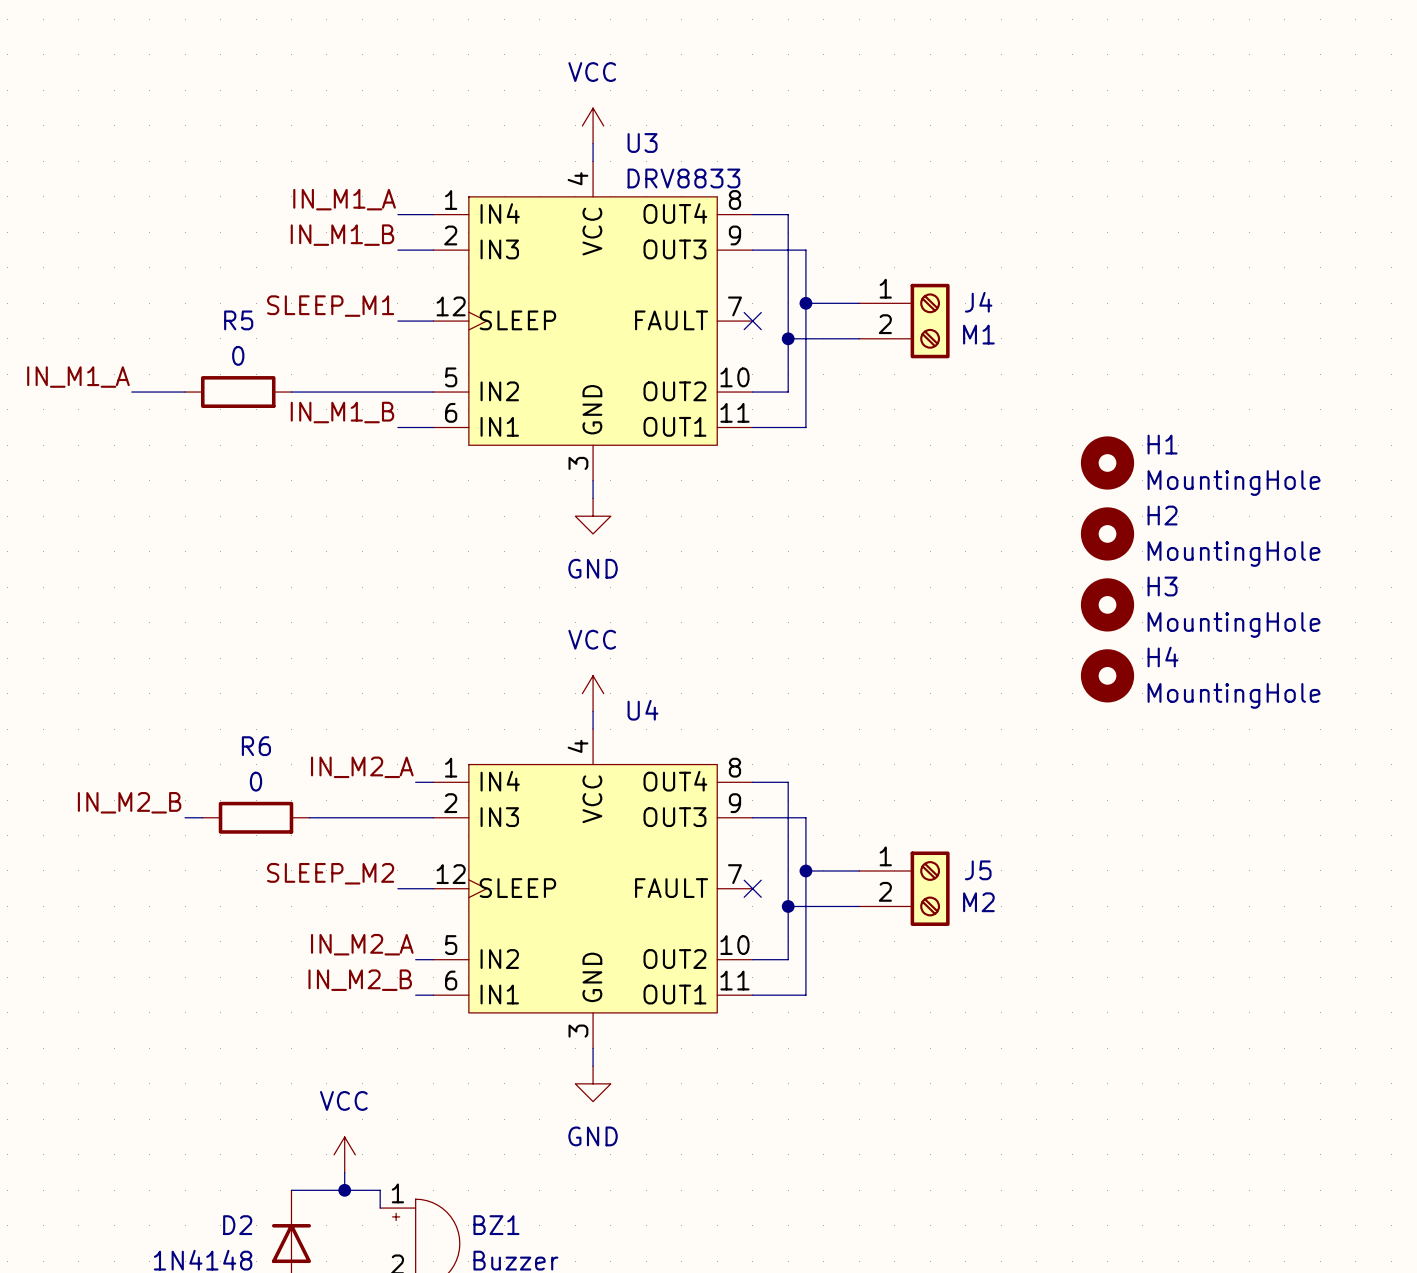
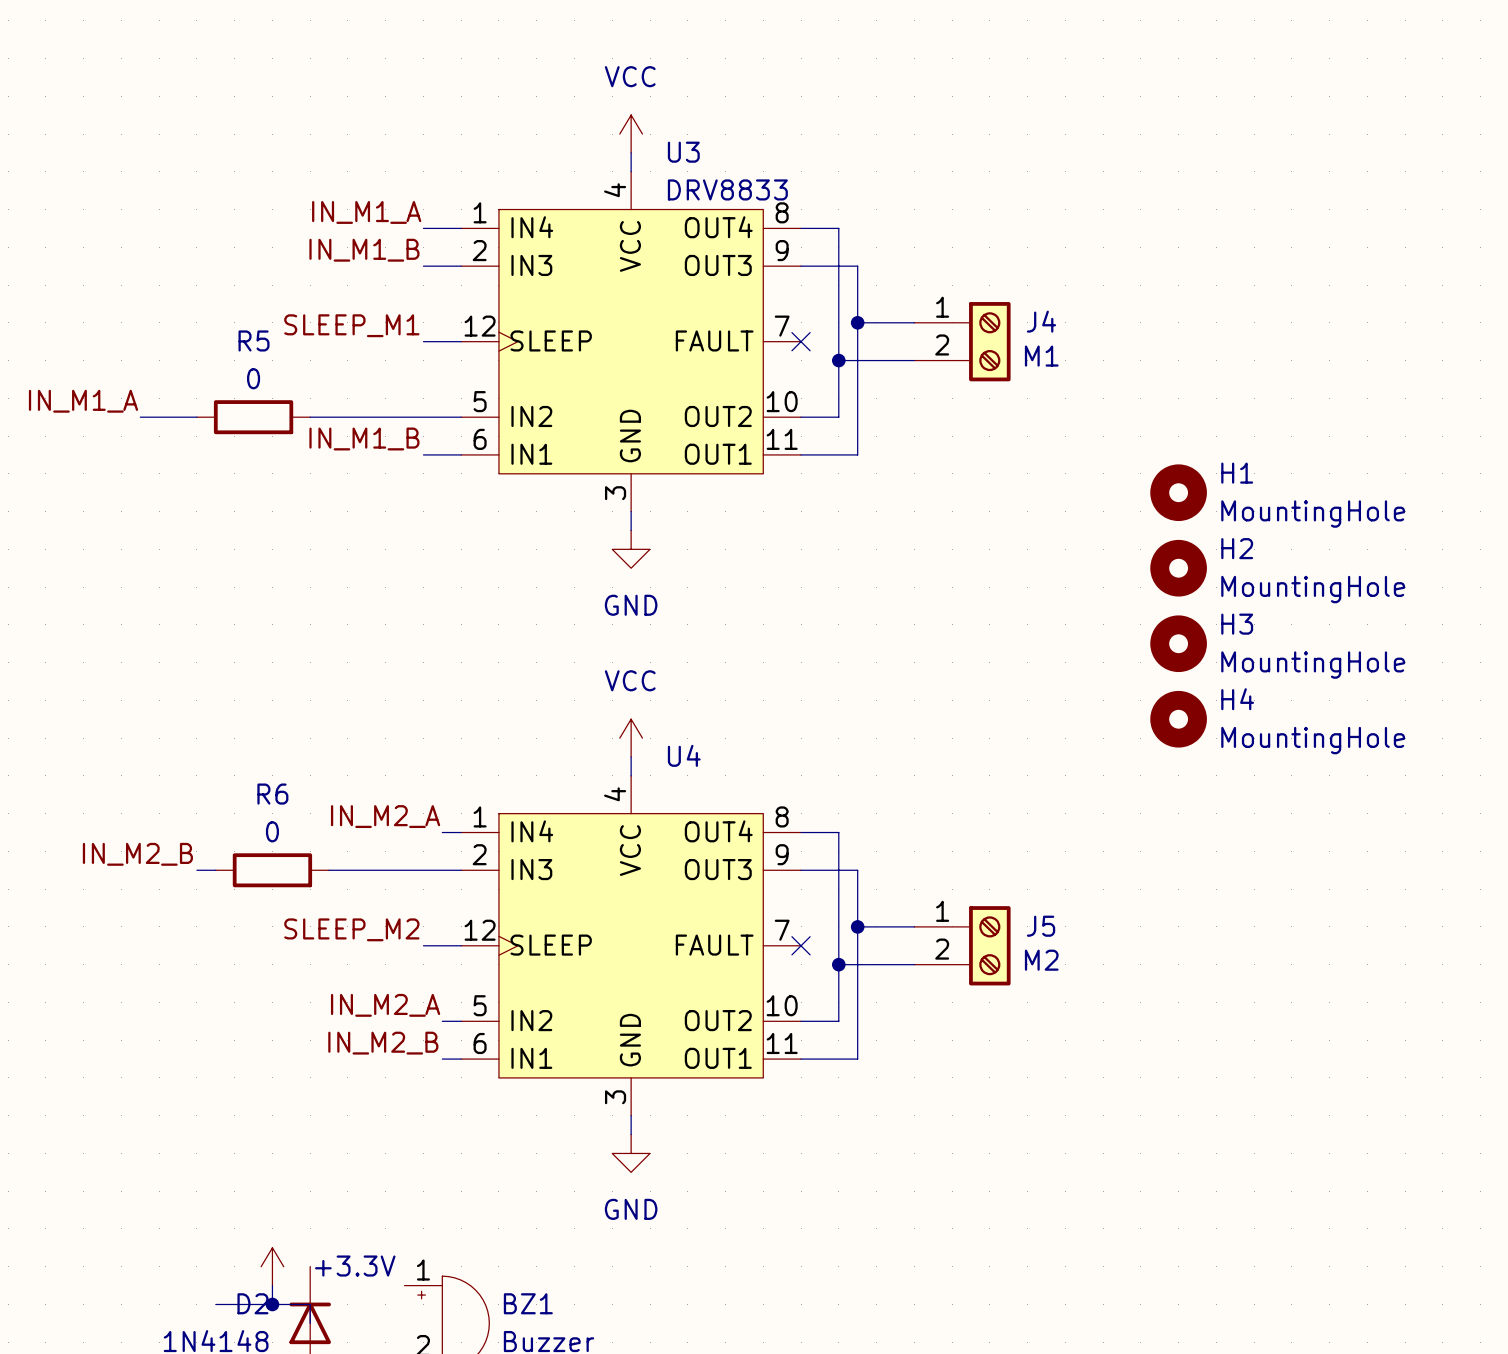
power symbol: VCC (344, 1154) -> none
wire: (344, 1172) (344, 1190) -> (272, 1285) (272, 1304)
power symbol: none -> +3.3V (272, 1266)
wire: (291, 1190) (380, 1190) (380, 1208) -> (215, 1304) (310, 1304) (310, 1323)
junction: (344, 1190) -> none
junction: none -> (272, 1304)

